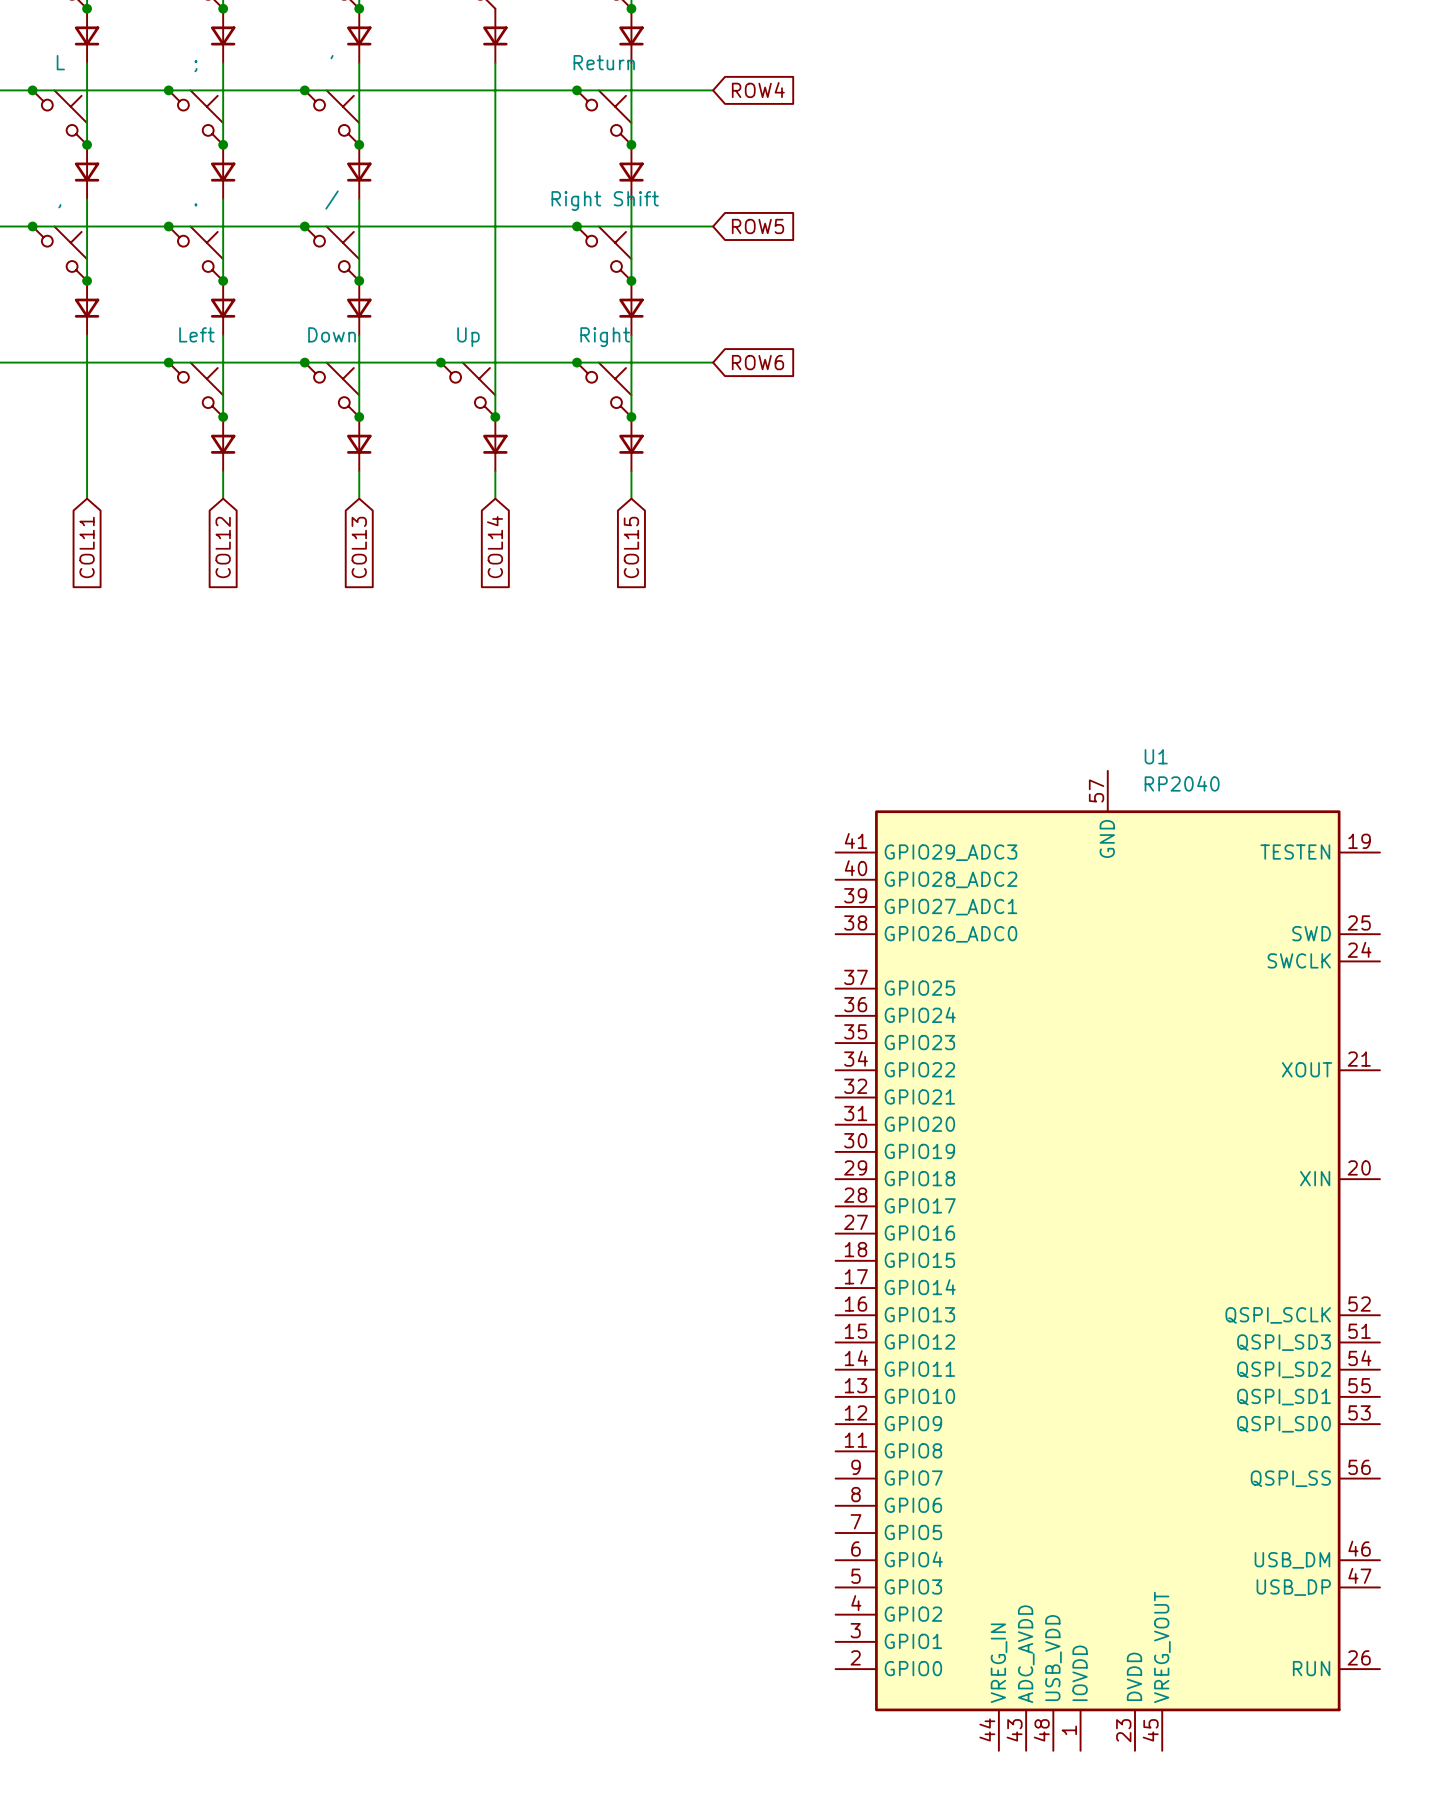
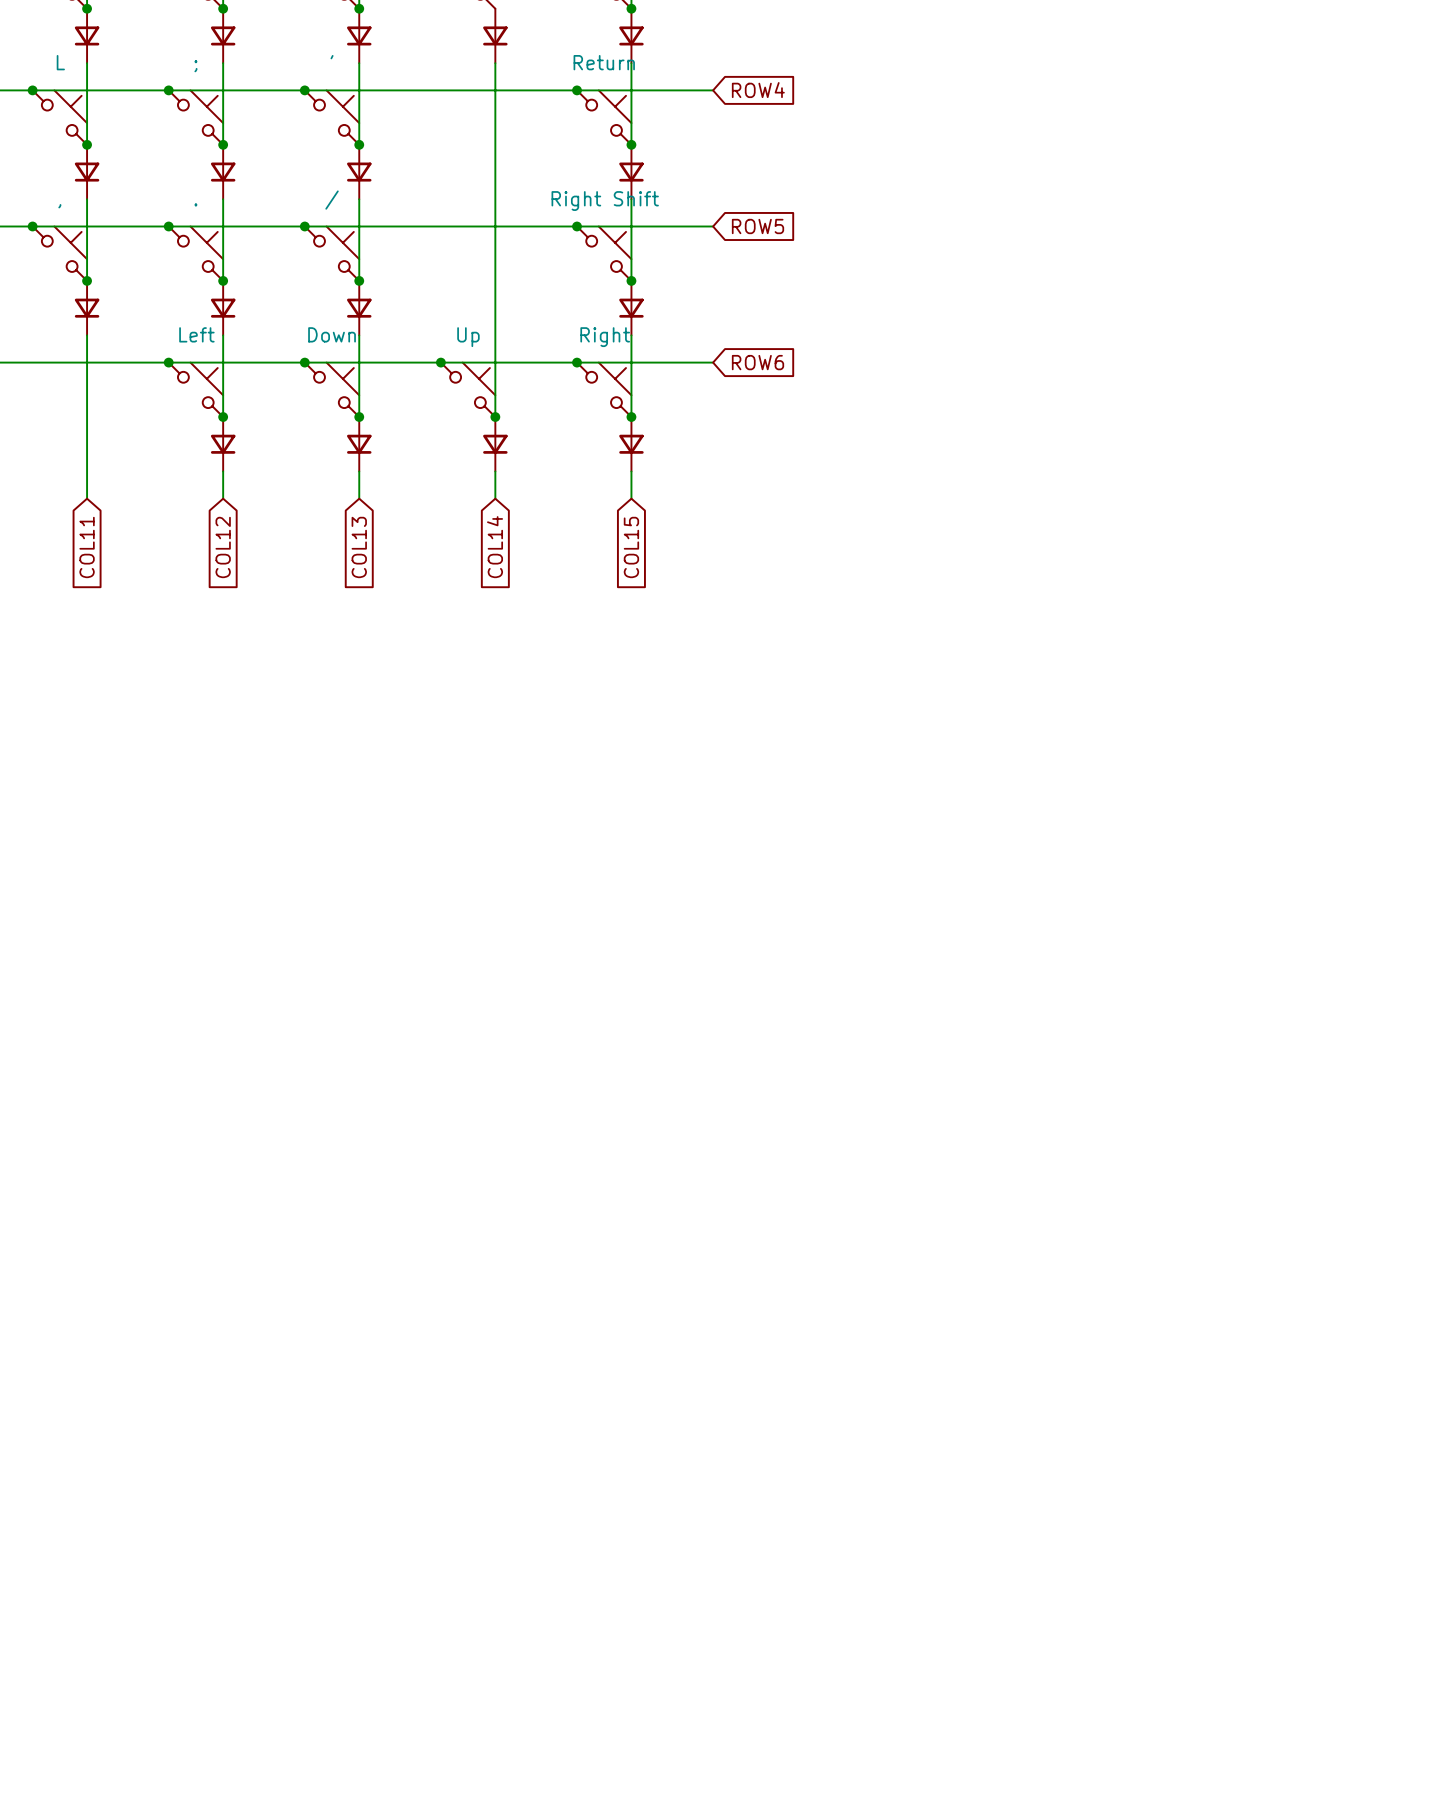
U1: RP2040 (1107, 1260) -> none

